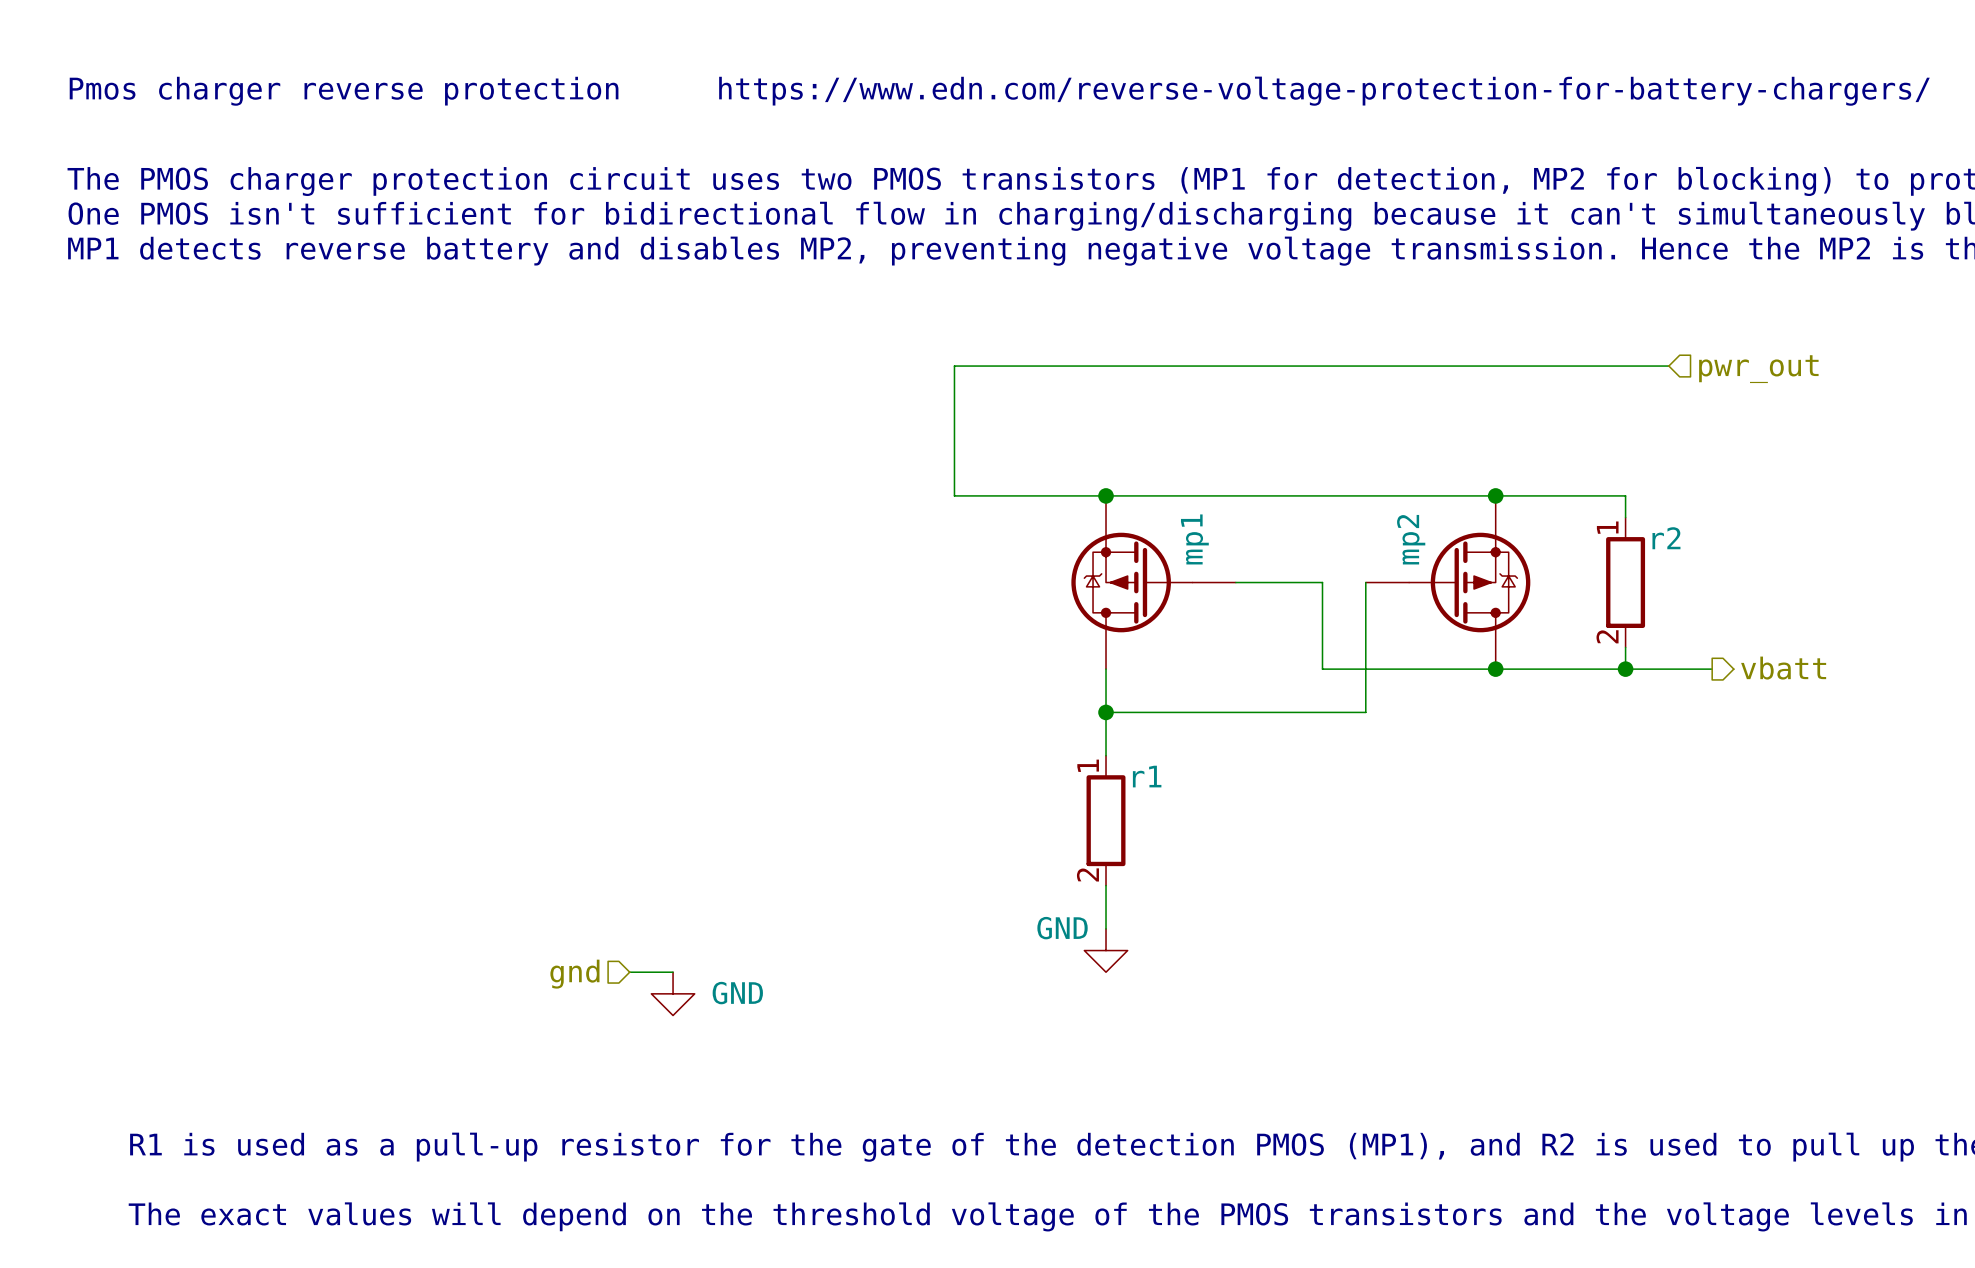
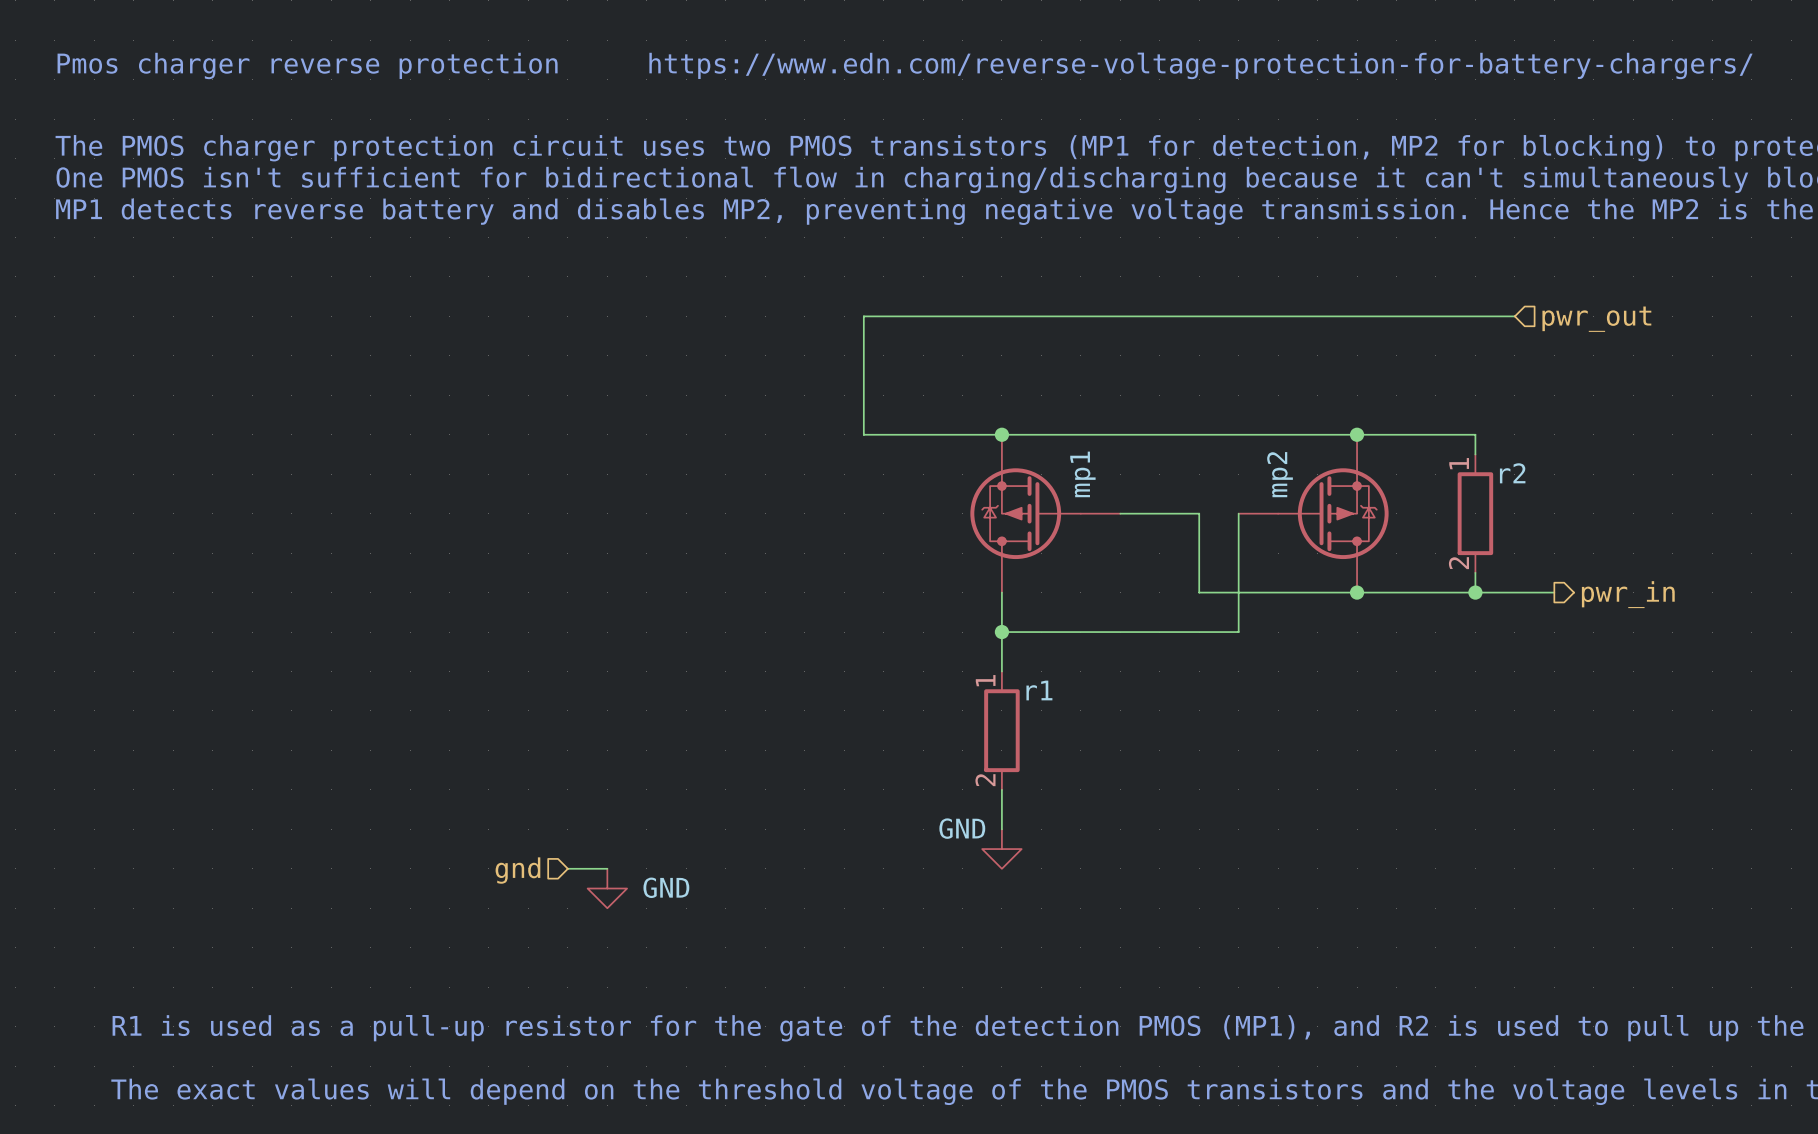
hierarchical label: vbatt (1783, 668) -> pwr_in (1628, 594)

